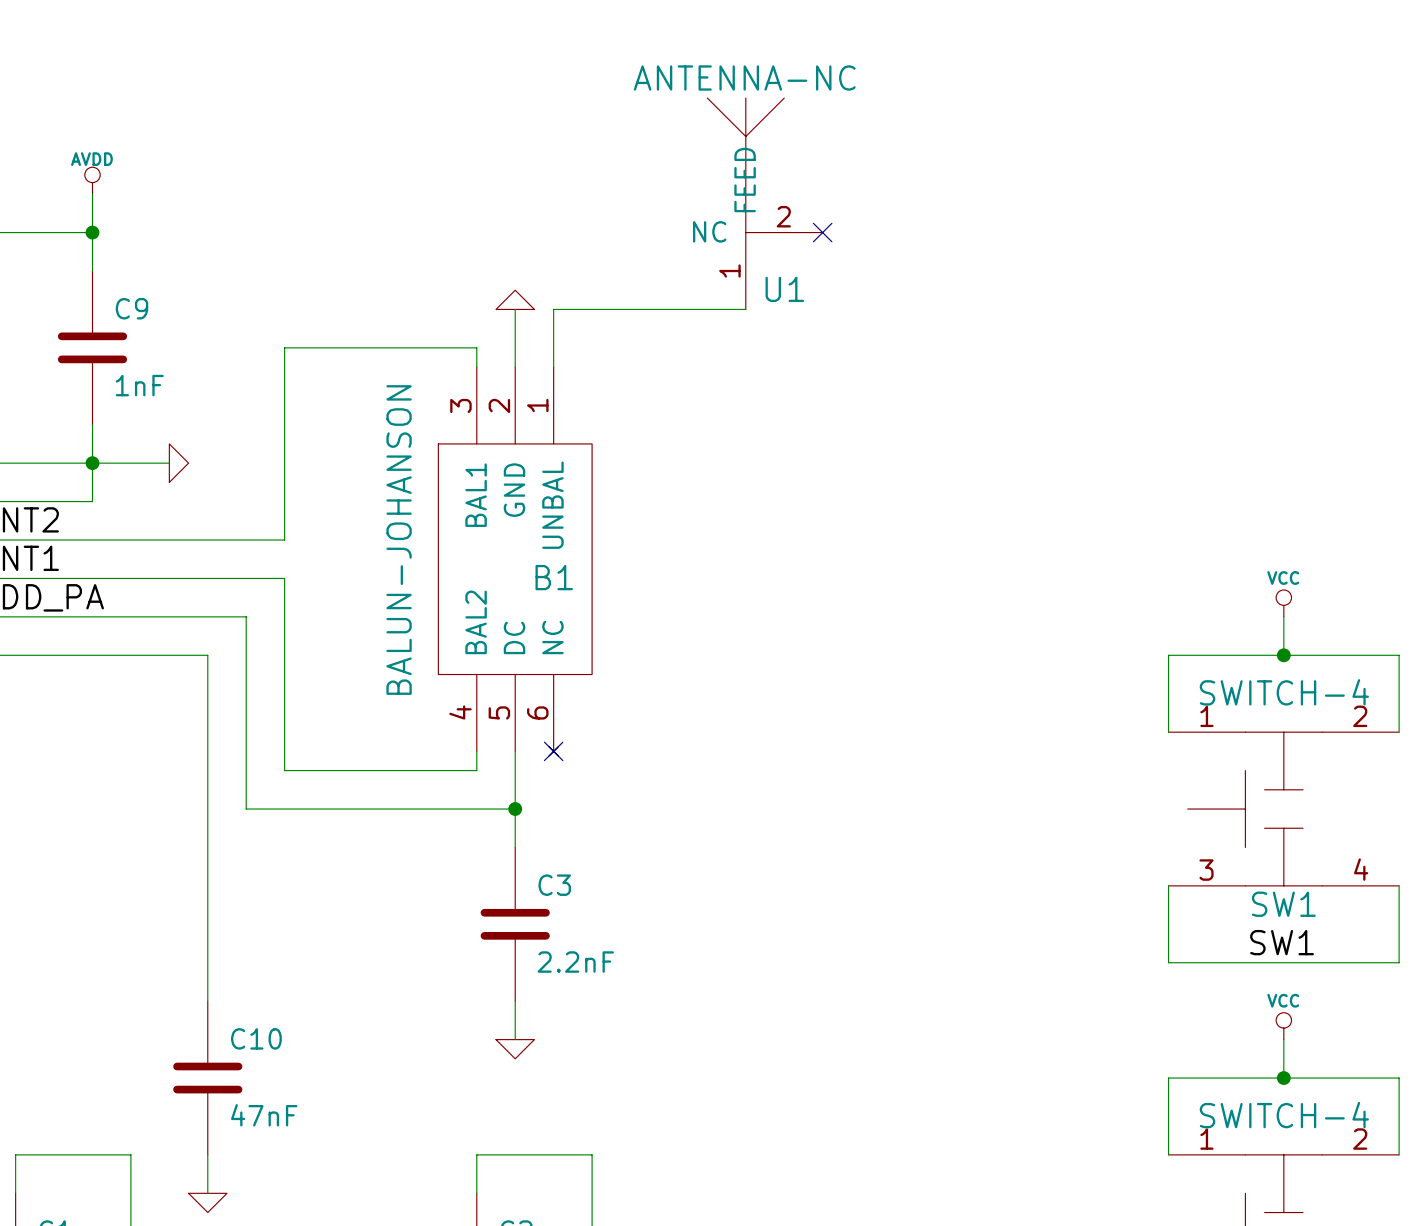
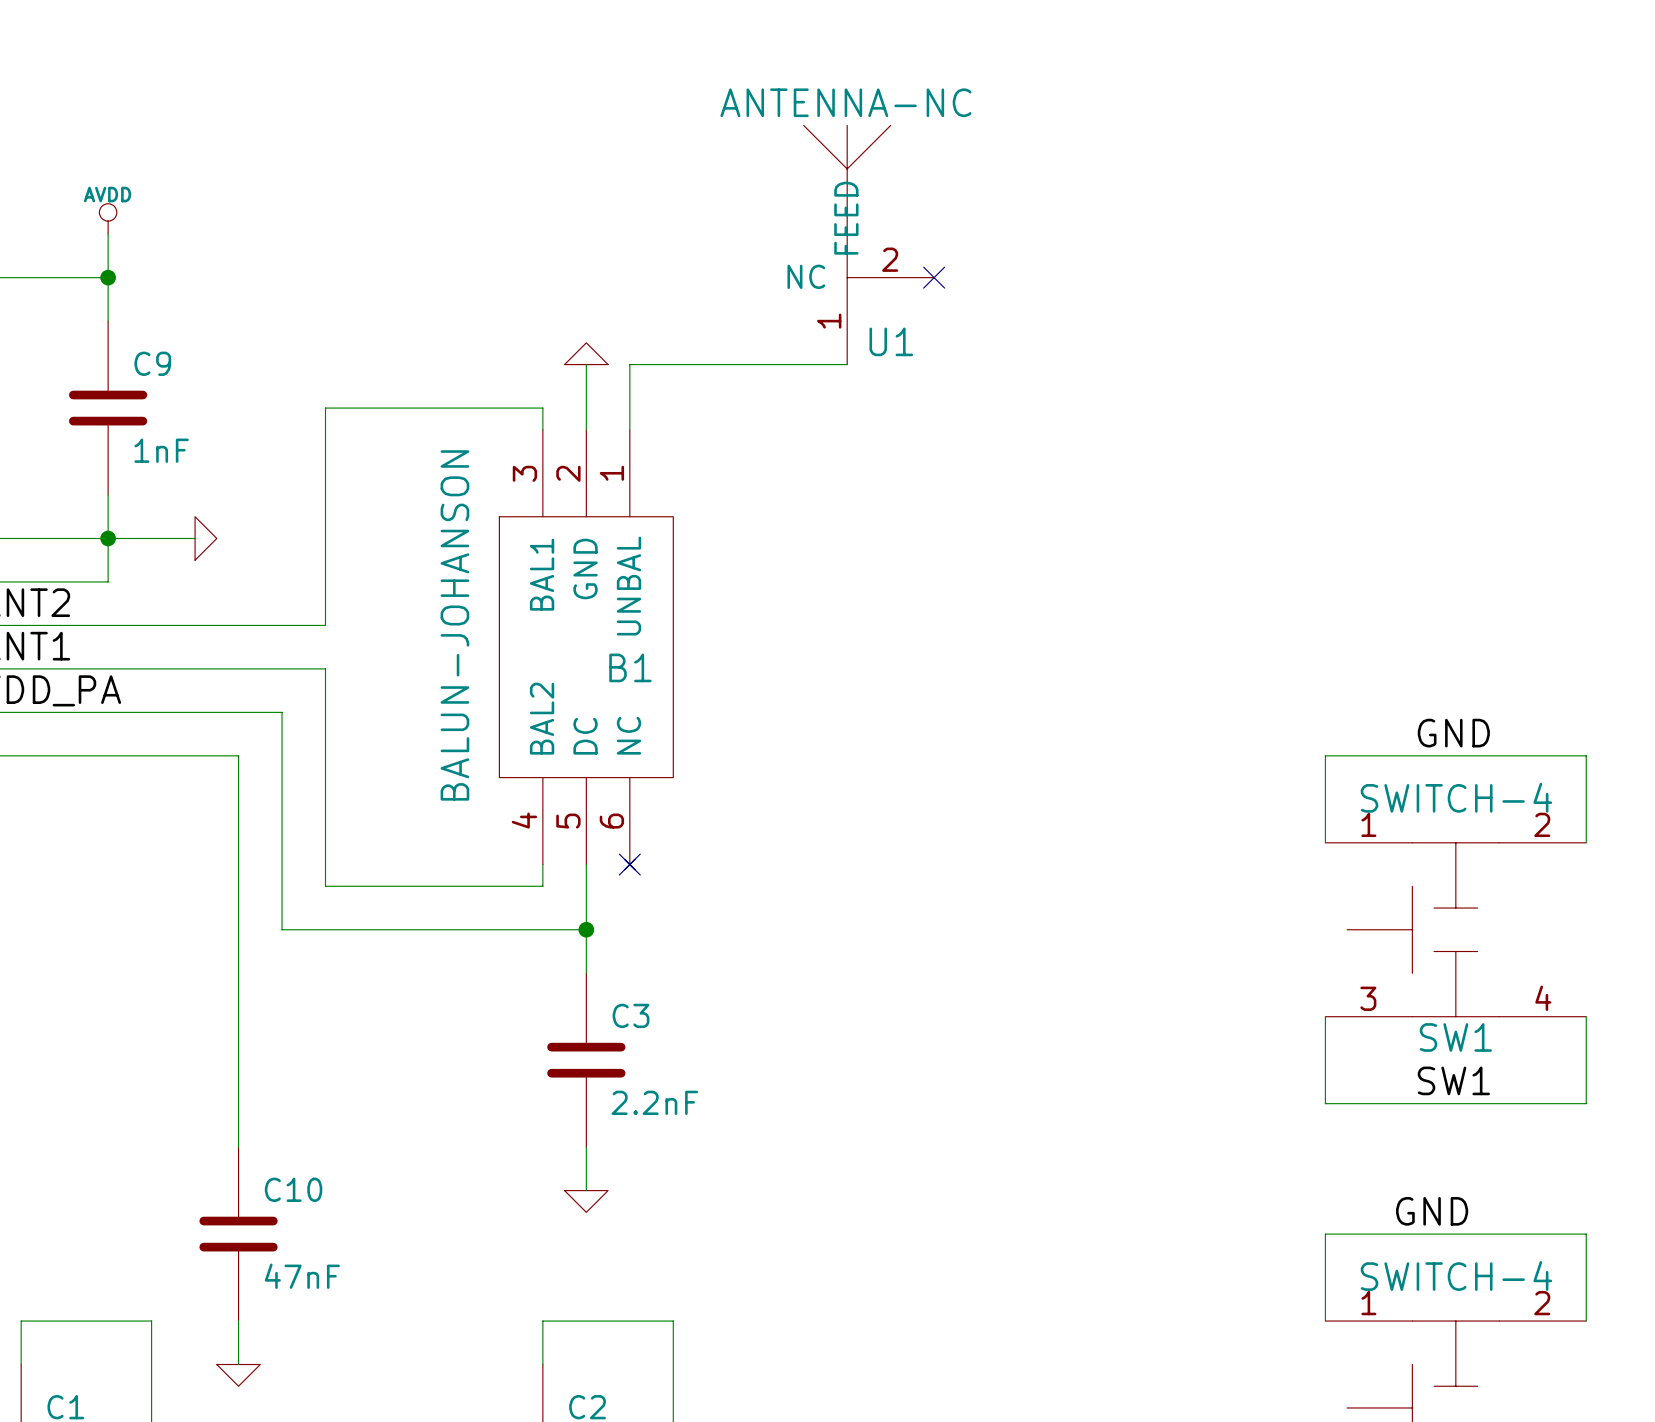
power symbol: VCC (1283, 603) -> none
wire: (1283, 616) (1283, 655) -> none
label: none -> GND (1453, 733)
junction: (1283, 655) -> none
power symbol: VCC (1283, 1026) -> none
wire: (1283, 1039) (1283, 1078) -> none
label: none -> GND (1432, 1211)
junction: (1283, 1078) -> none

